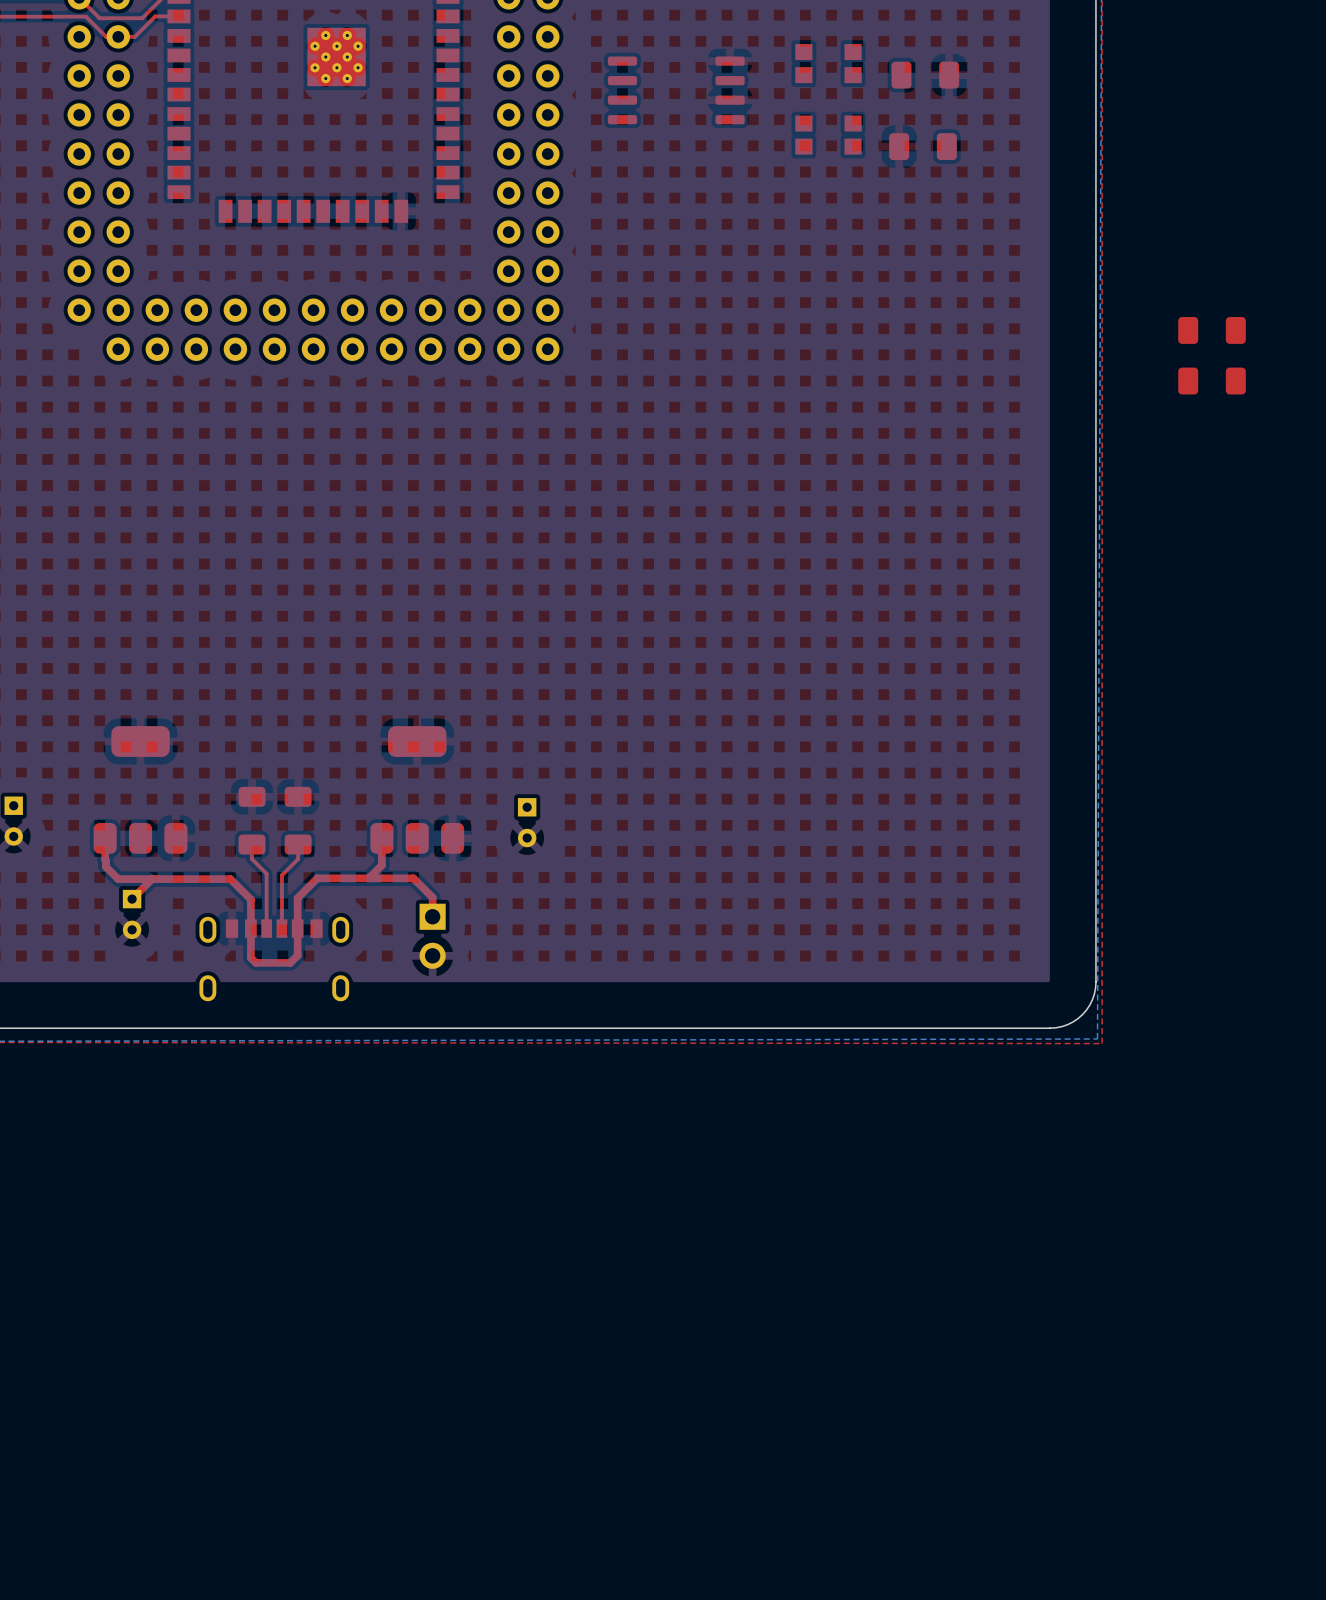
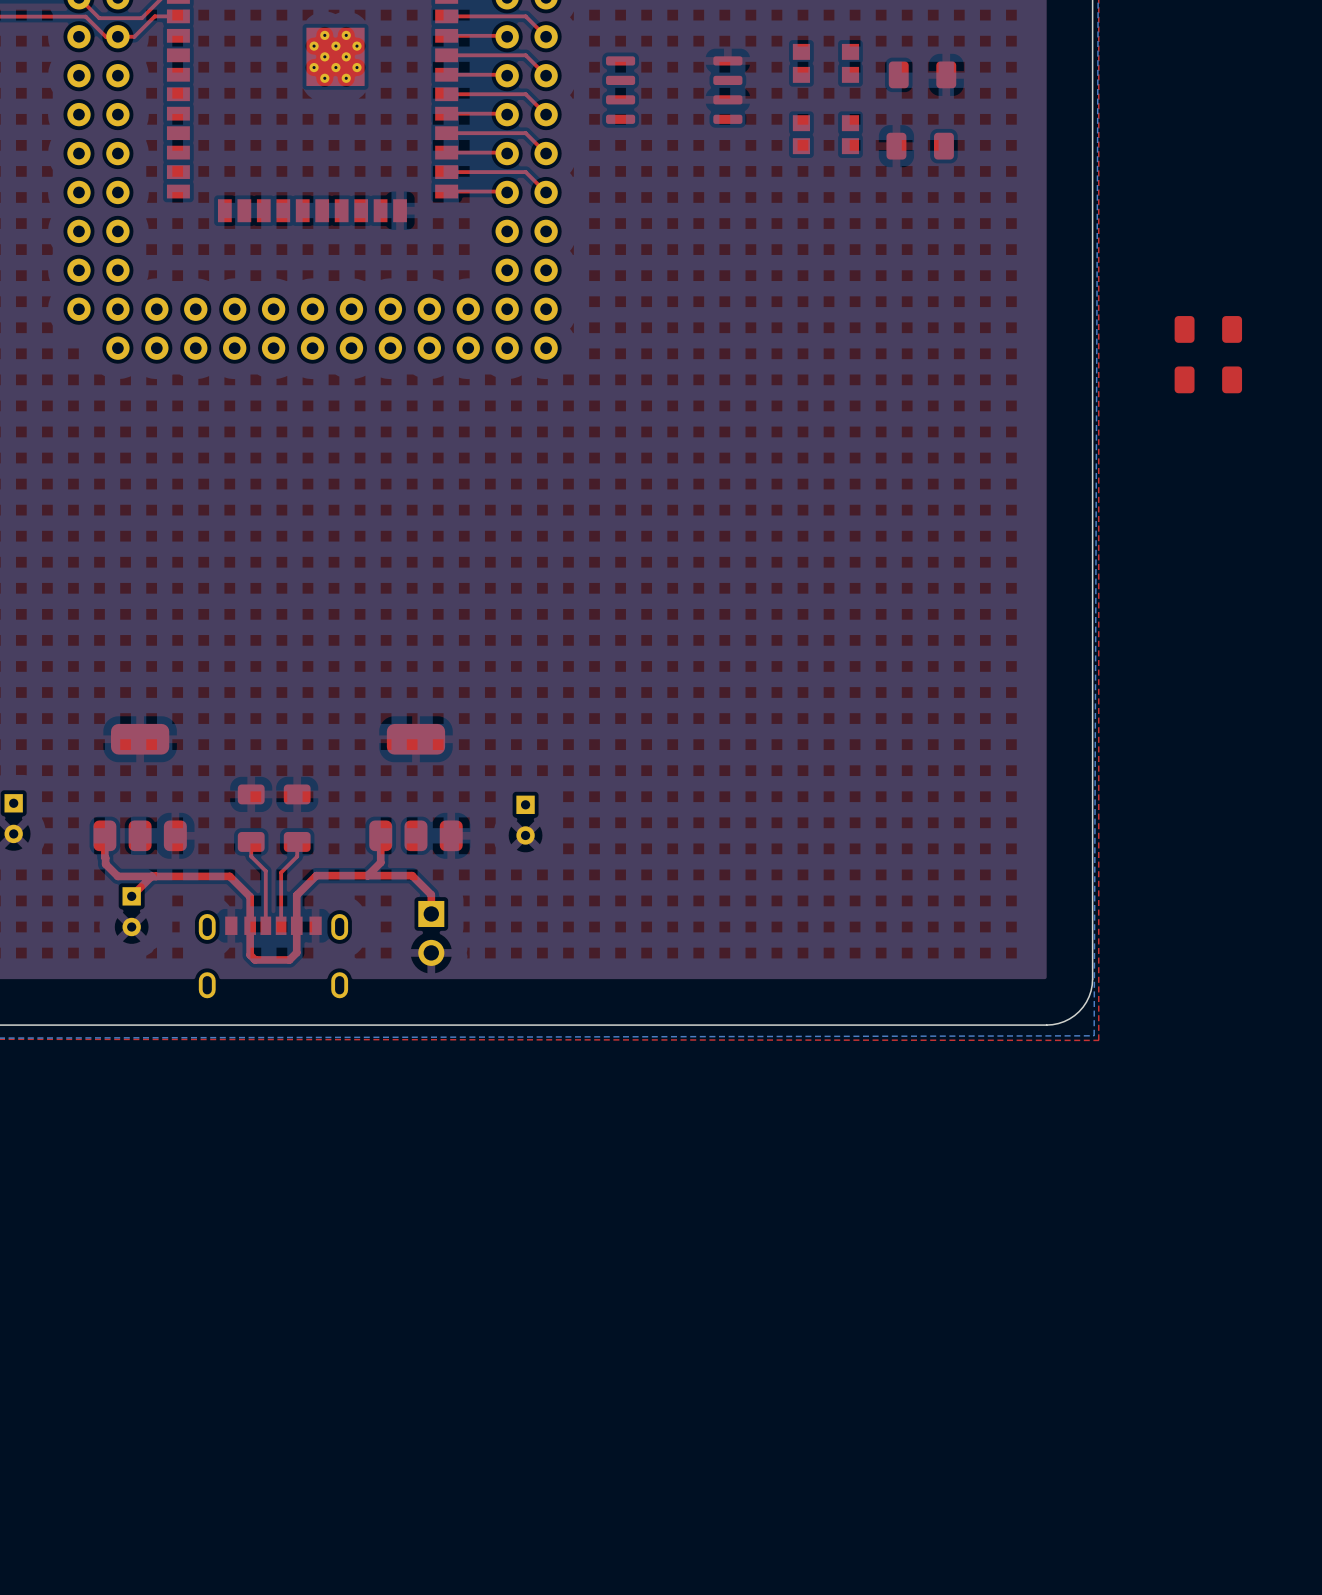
top track: none -> (446, 16) (525, 16) (546, 36)
top track: none -> (446, 35) (507, 36)
top track: none -> (446, 55) (525, 55) (546, 75)
top track: none -> (446, 74) (507, 75)
top track: none -> (446, 94) (525, 94) (546, 114)
top track: none -> (446, 113) (507, 114)
top track: none -> (446, 133) (525, 133) (546, 153)
top track: none -> (446, 152) (507, 153)
top track: none -> (446, 172) (525, 172) (546, 192)
top track: none -> (446, 191) (507, 192)

